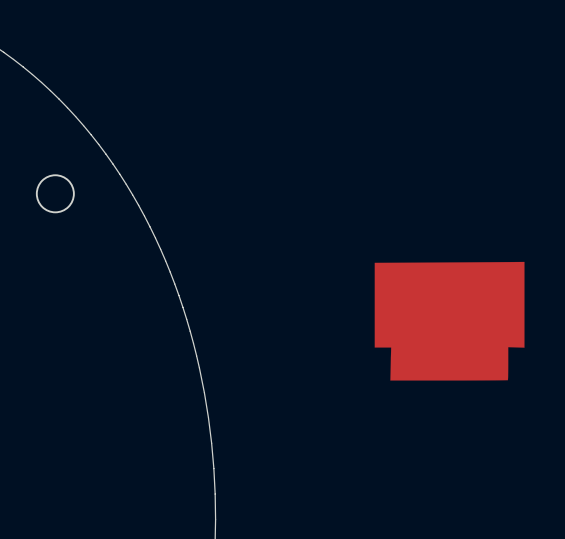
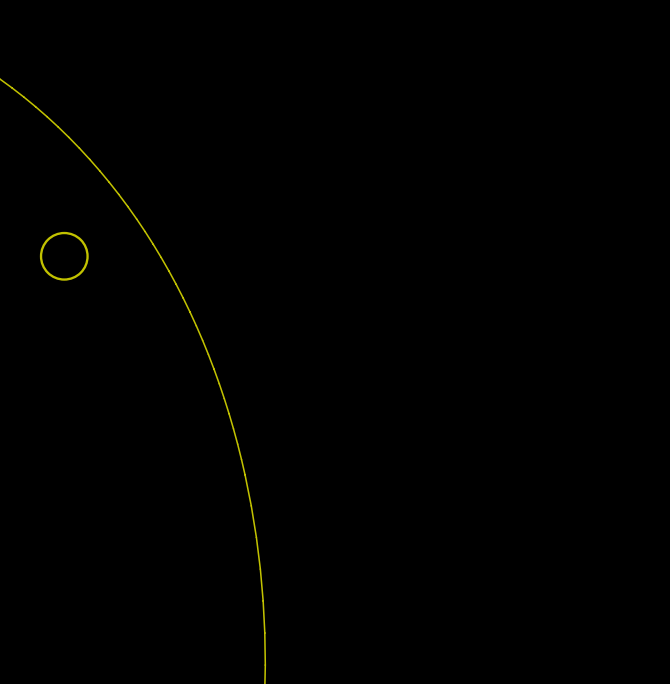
part: (449, 321) -> none

